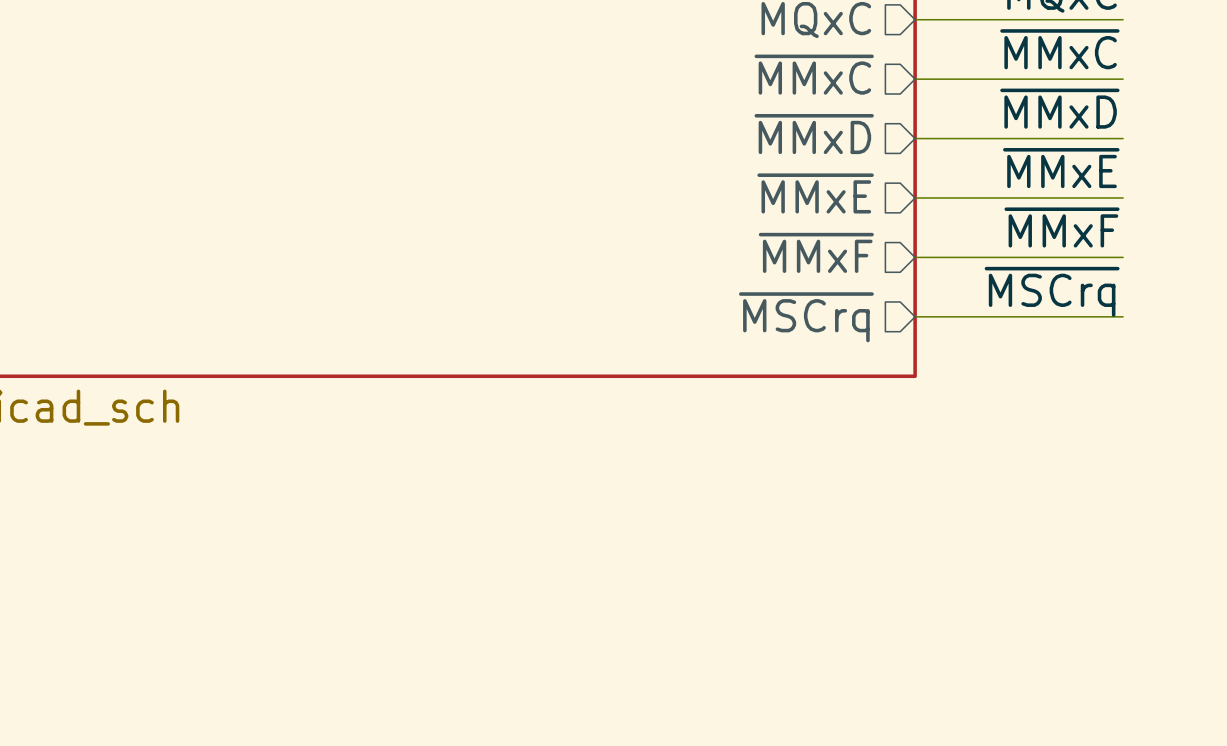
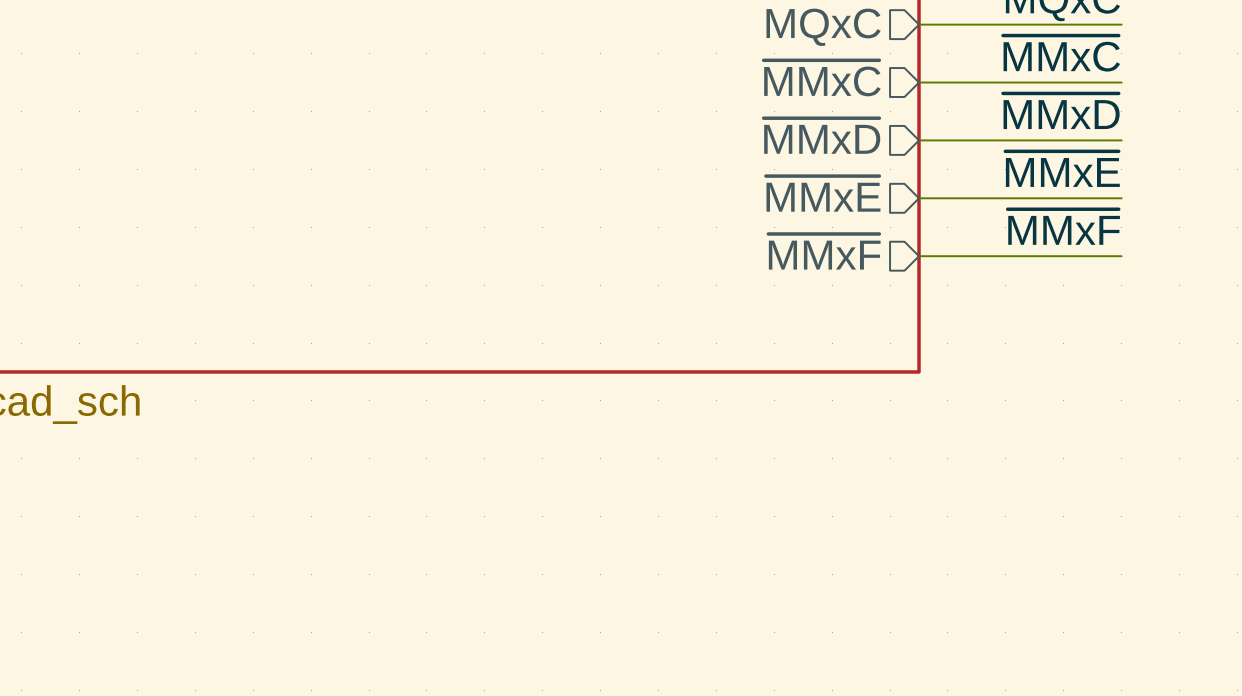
label: ~{MSCrq} (1052, 291) -> none
wire: (915, 316) (1123, 316) -> none
sheet pin: ~{MSCrq} (806, 317) -> none

